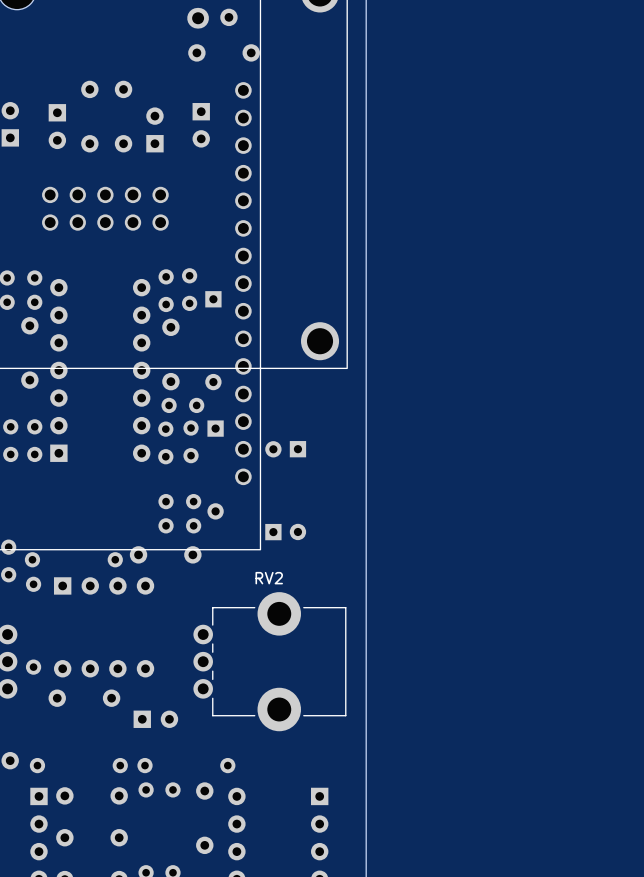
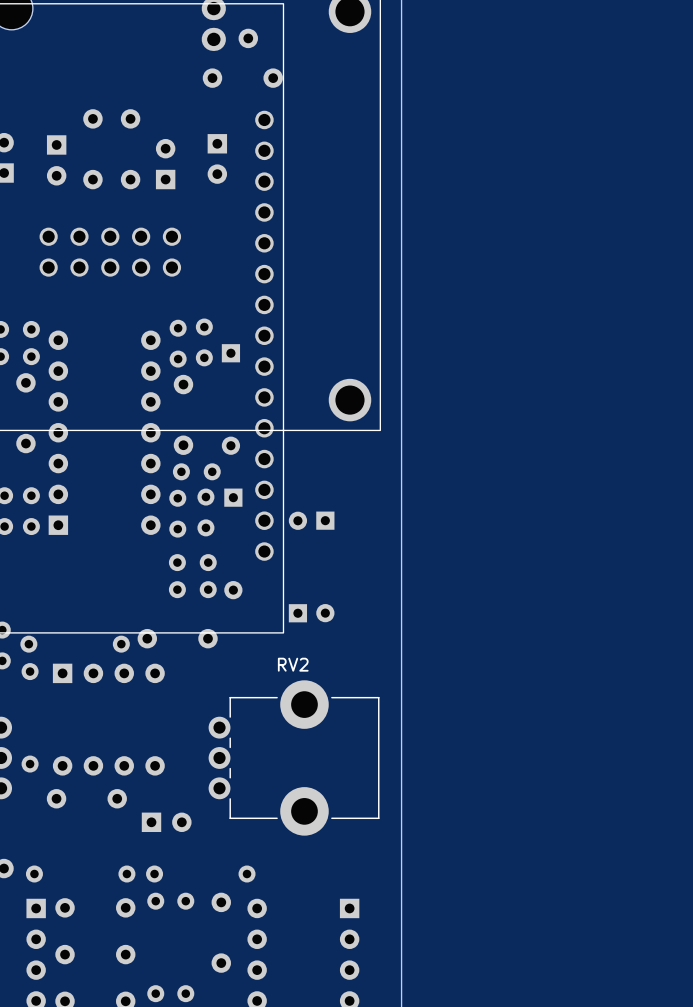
part: none -> (192, 562)
part: (179, 501) -> none
part: none -> (192, 589)
part: (179, 525) -> none

